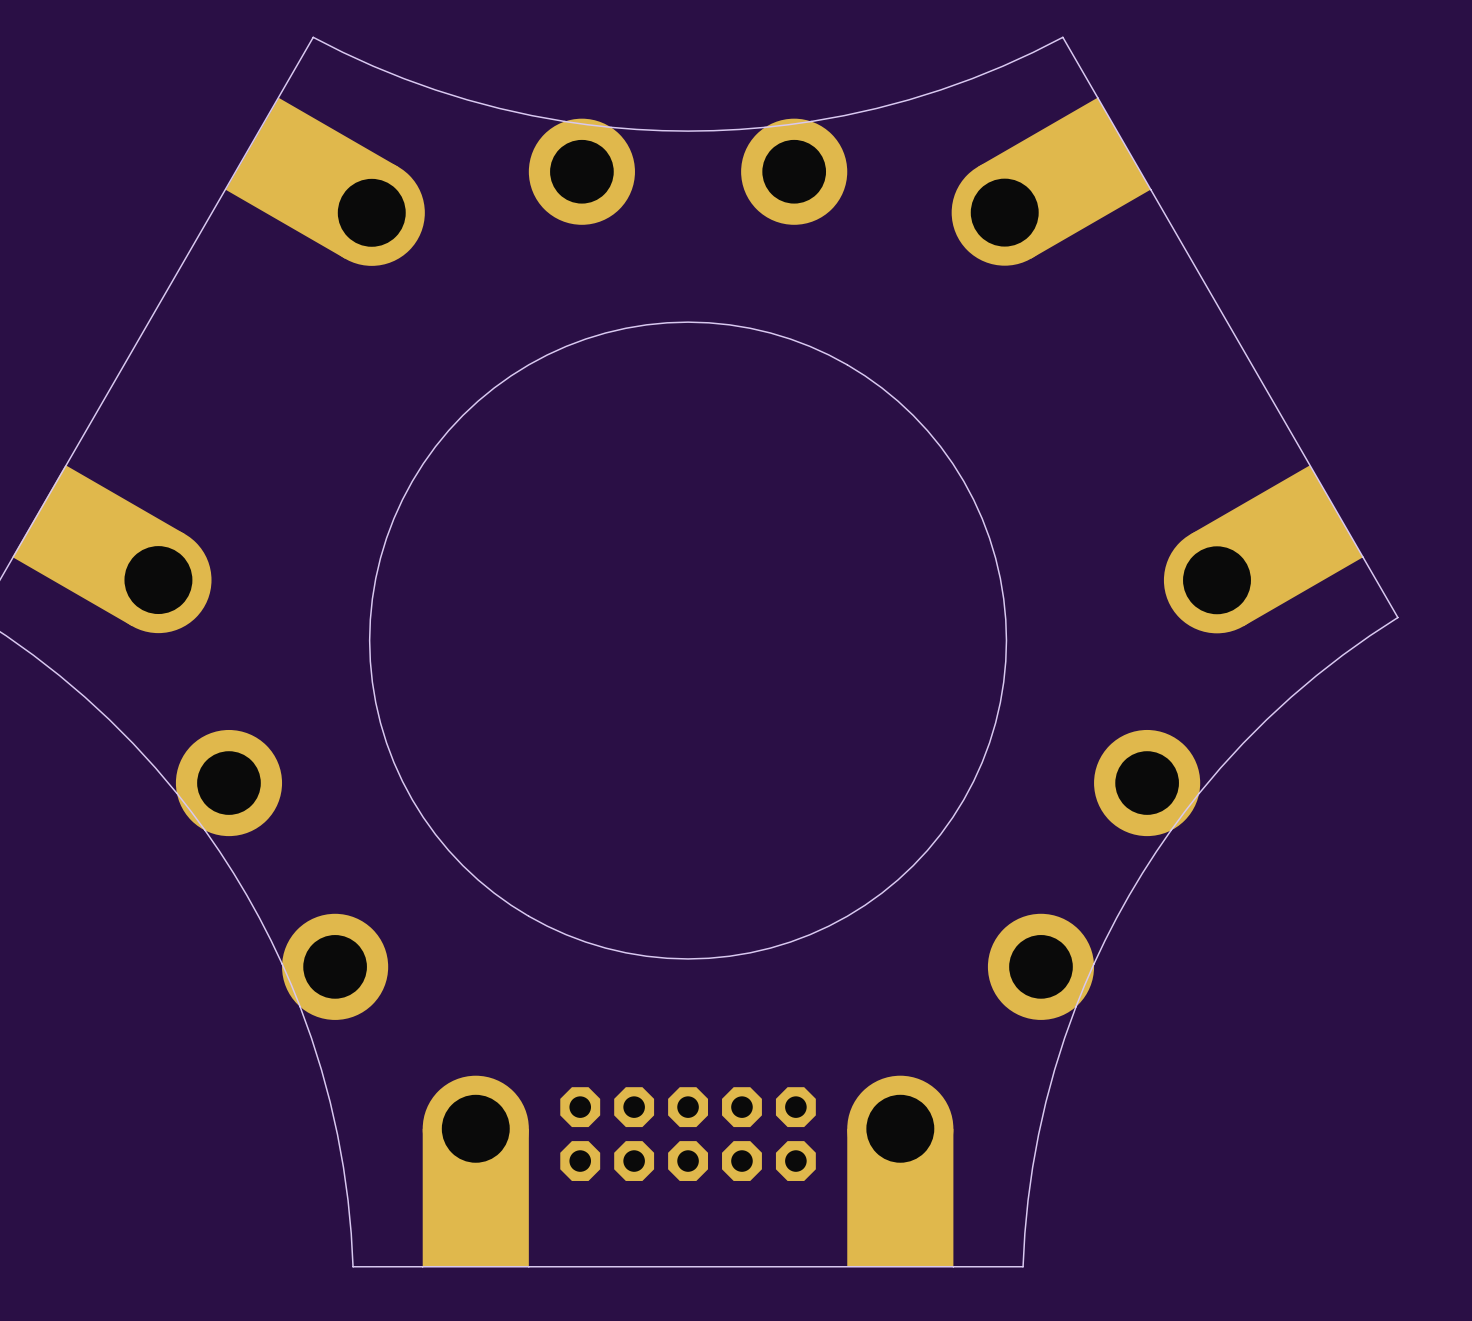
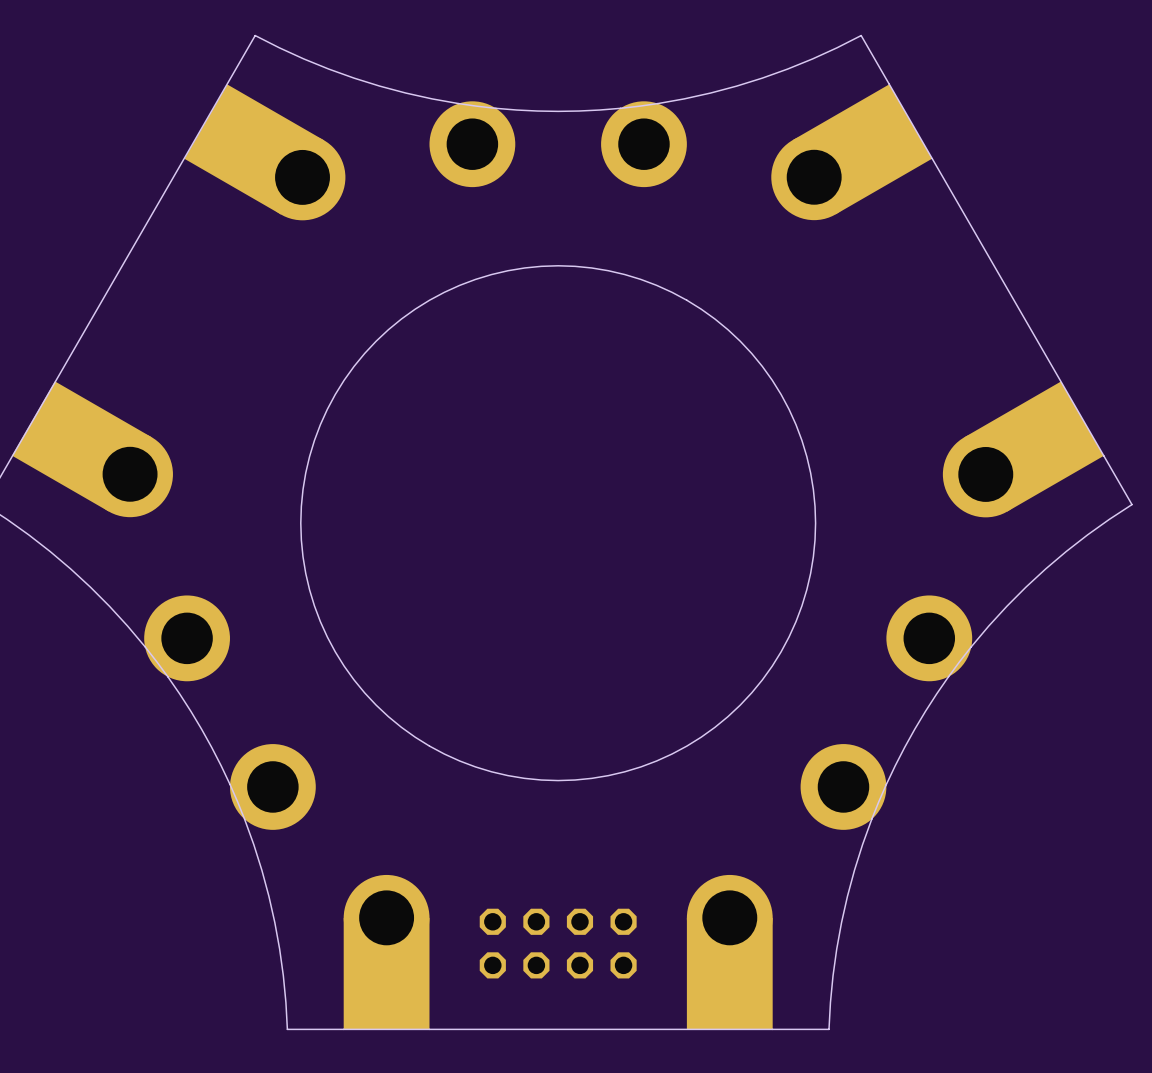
part: (688, 1134) -> none
part: none -> (558, 943)

